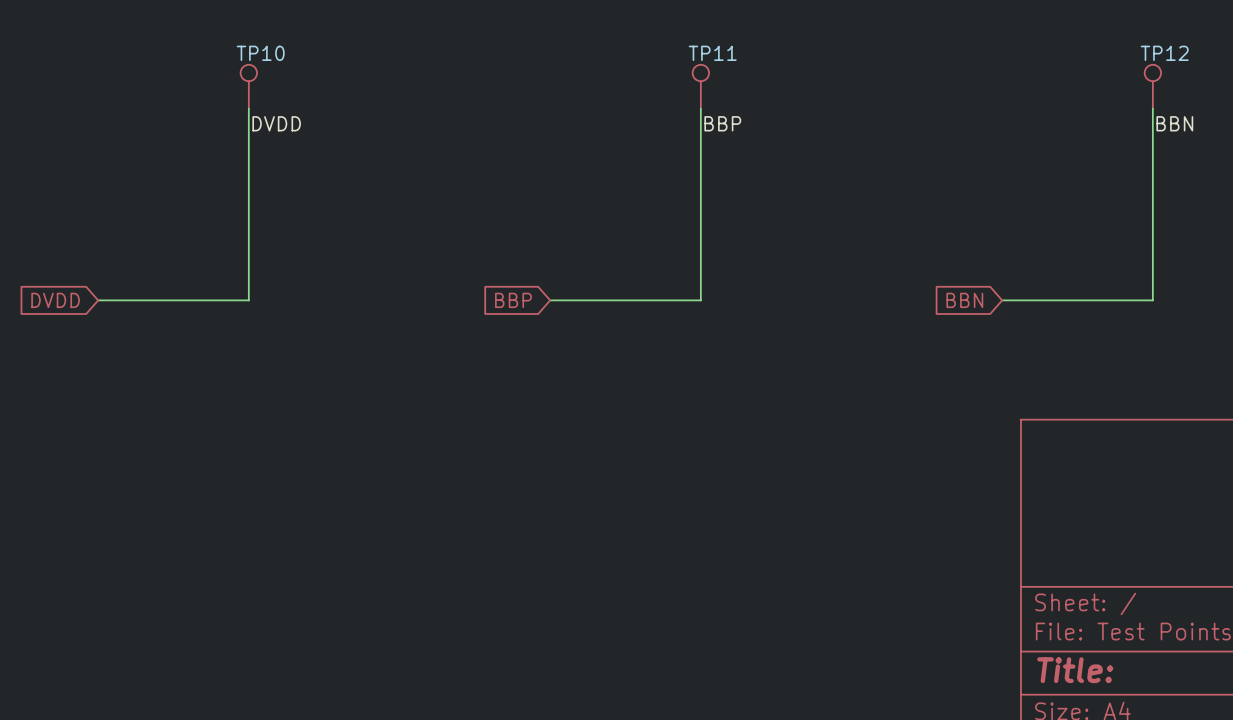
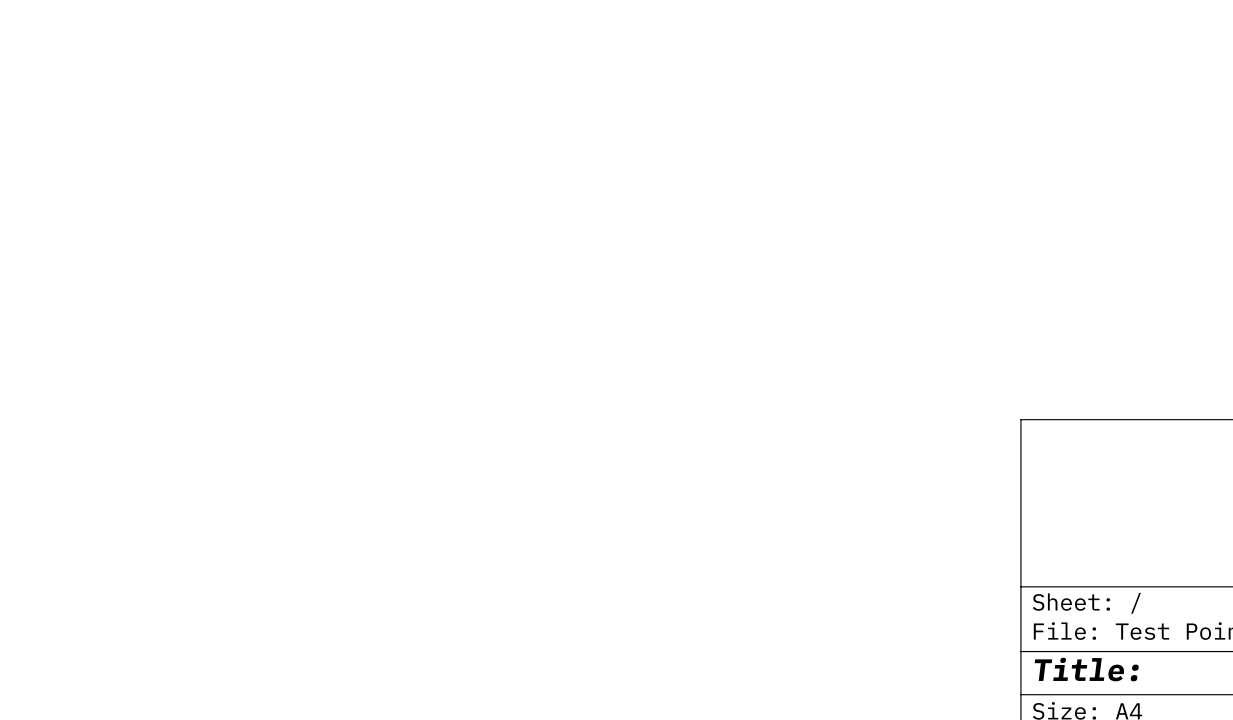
TP10: (248, 86) -> none
TP11: (700, 86) -> none
TP12: (1152, 86) -> none
wire: (248, 108) (248, 300) (98, 300) -> none
wire: (700, 108) (700, 300) (550, 300) -> none
wire: (1152, 108) (1152, 300) (1002, 300) -> none
label: DVDD (276, 123) -> none
label: BBP (722, 123) -> none
label: BBN (1174, 123) -> none
global label: DVDD (55, 300) -> none
global label: BBP (513, 300) -> none
global label: BBN (964, 300) -> none

